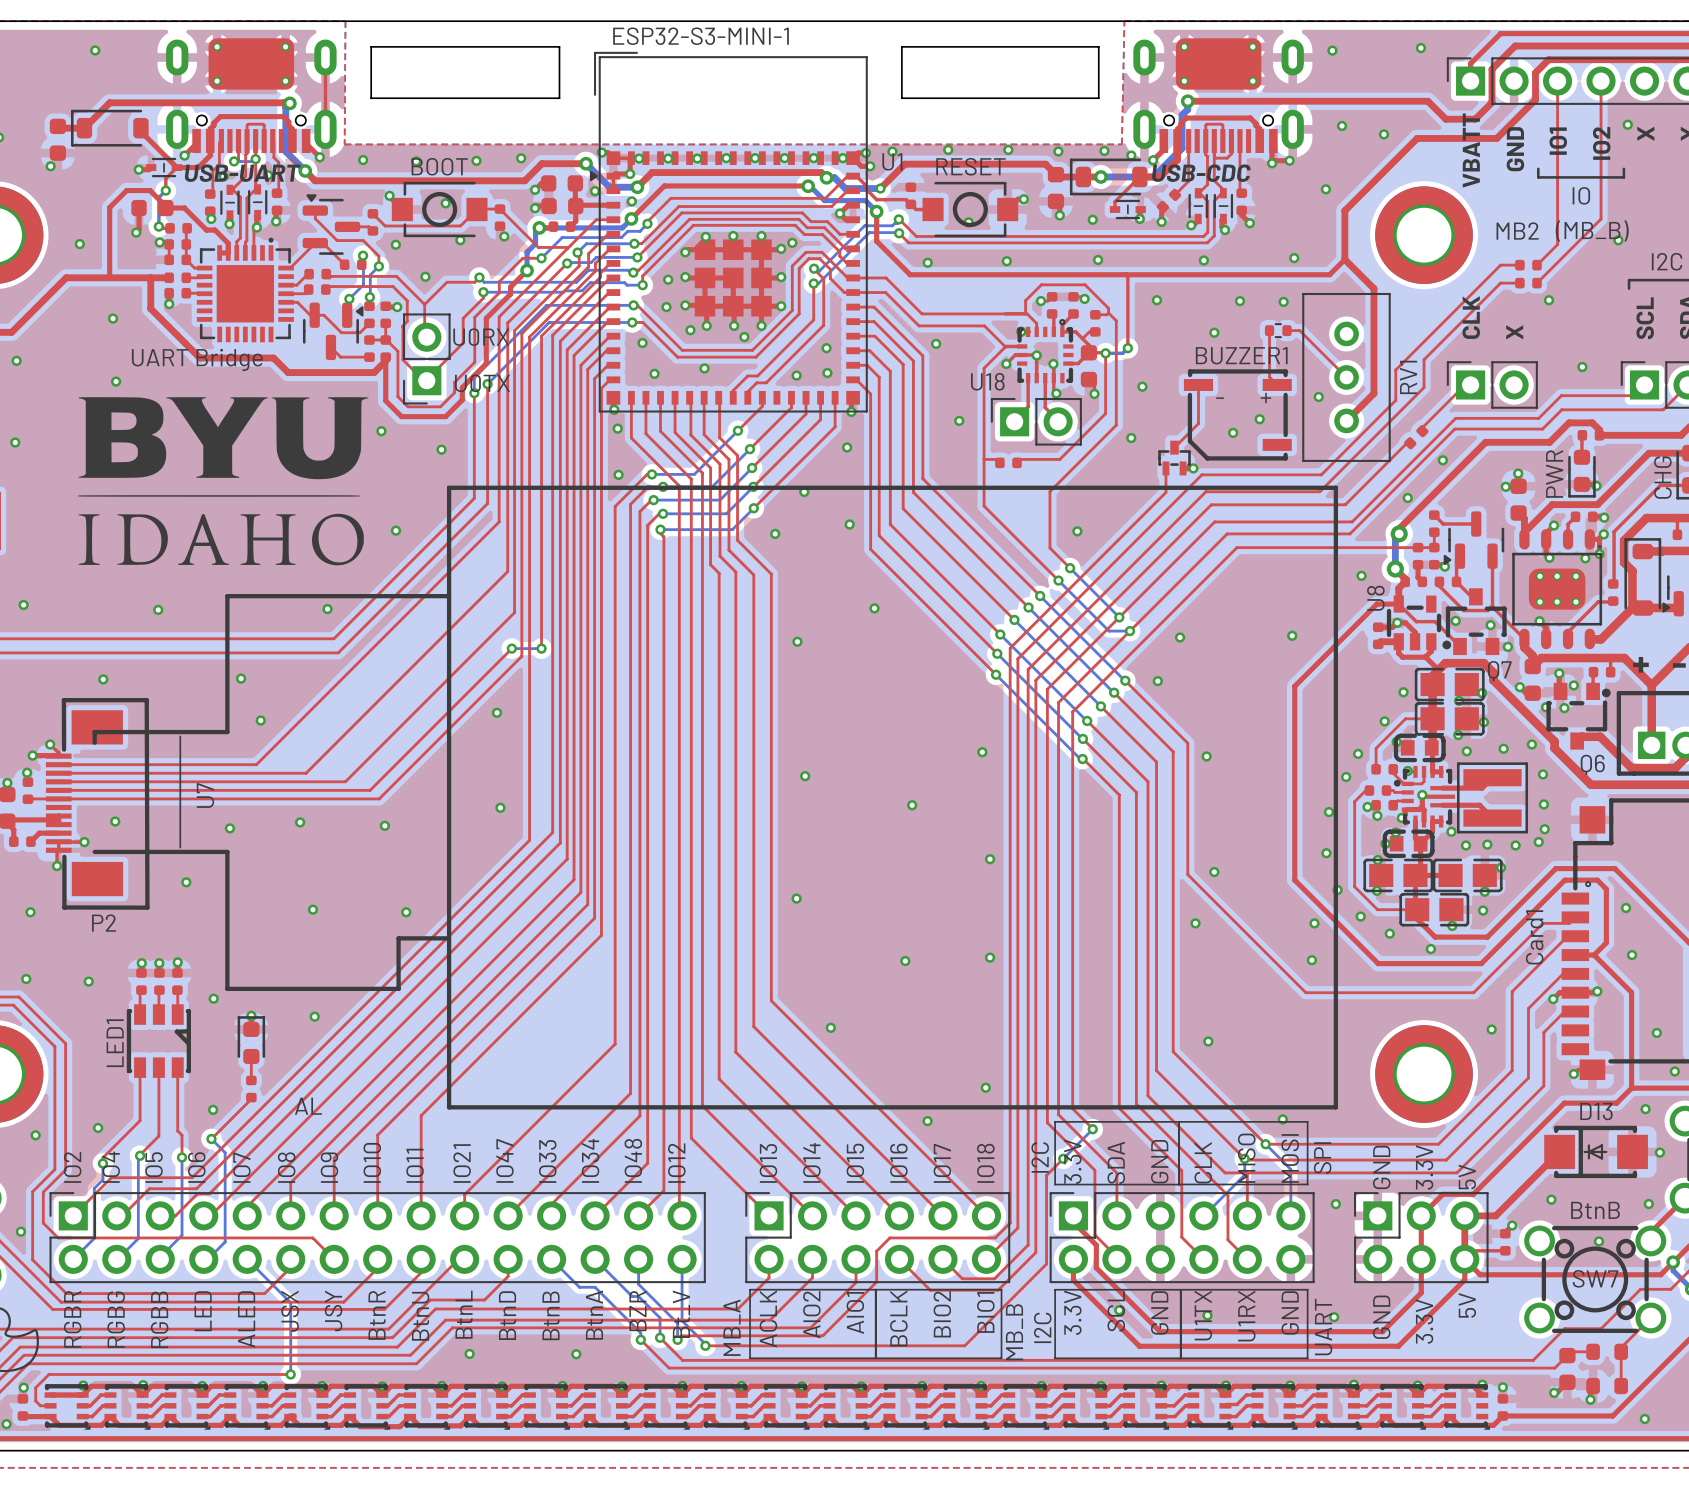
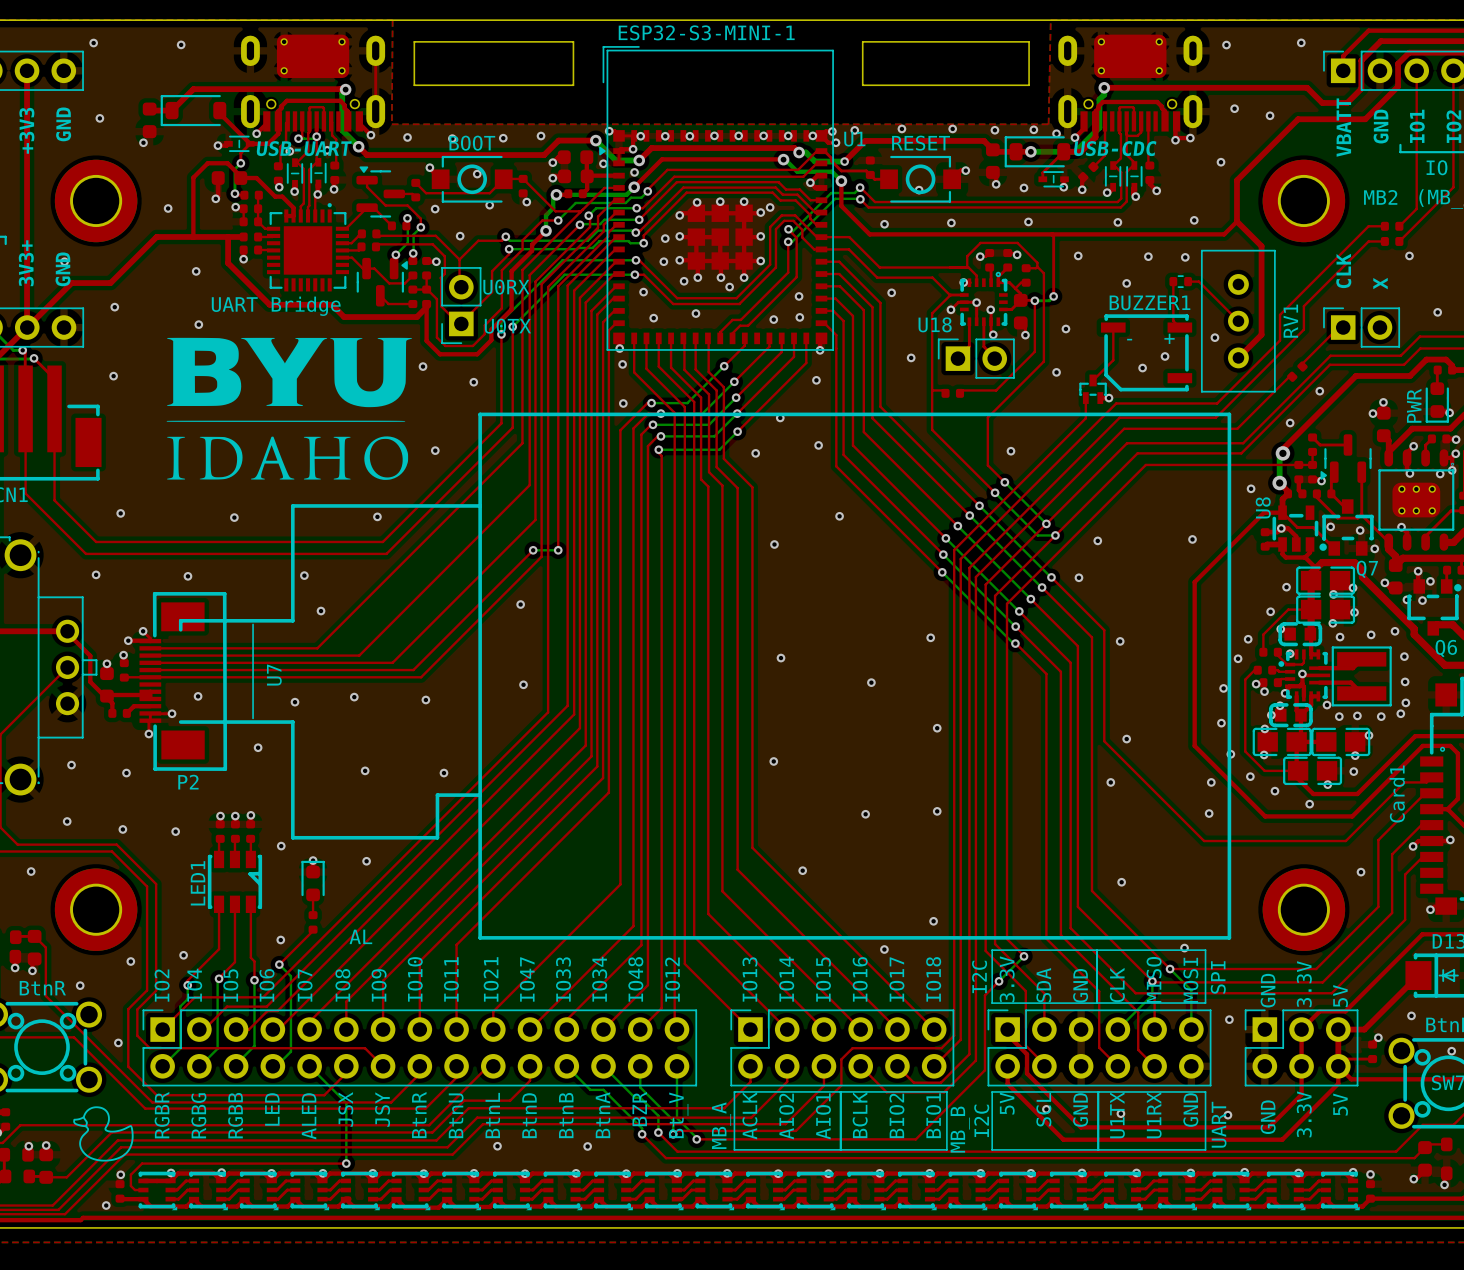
text: 3.3V (1072, 1312) -> 5V (1007, 1103)

